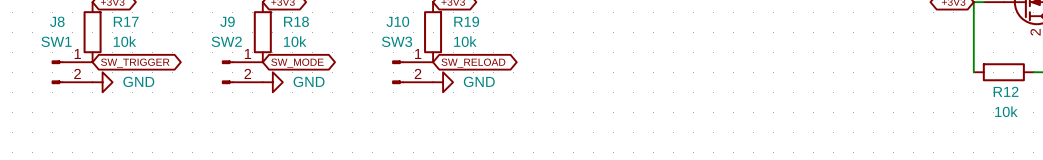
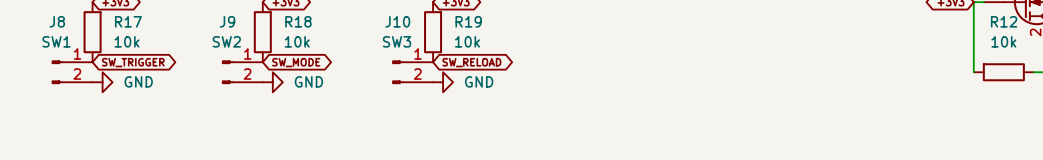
R12 name position: R12 (1006, 91) -> R12 (1004, 21)
R12 value position: 10k (1006, 111) -> 10k (1003, 41)

